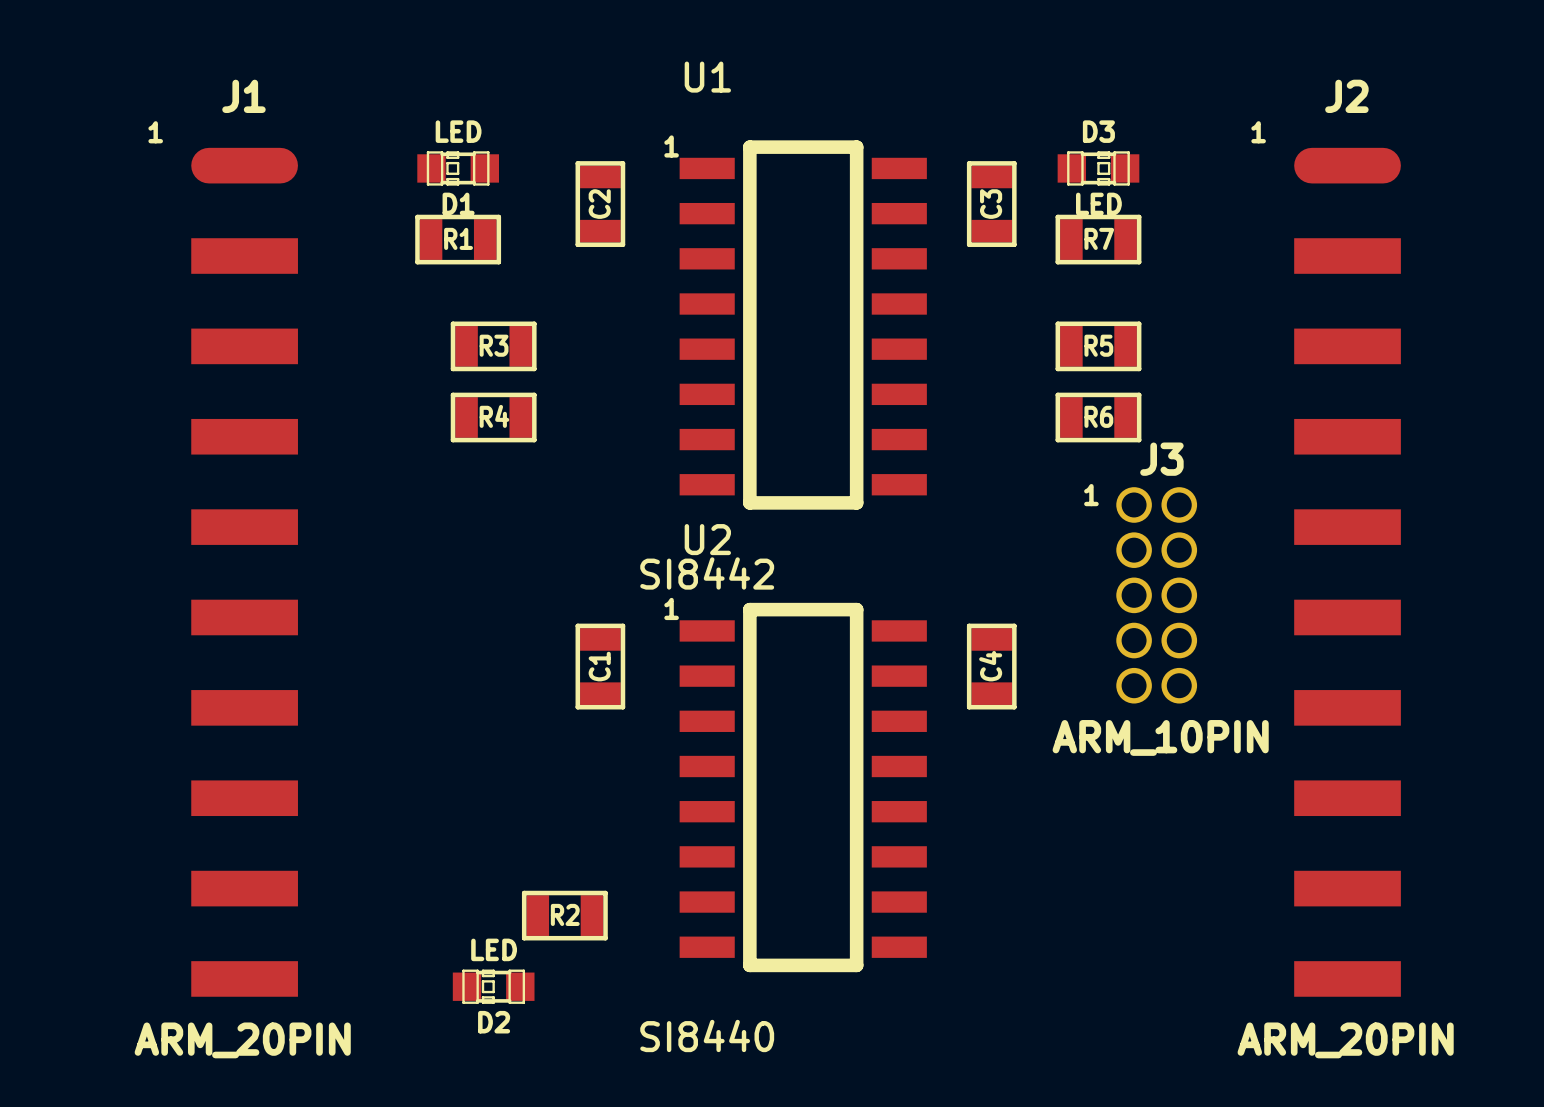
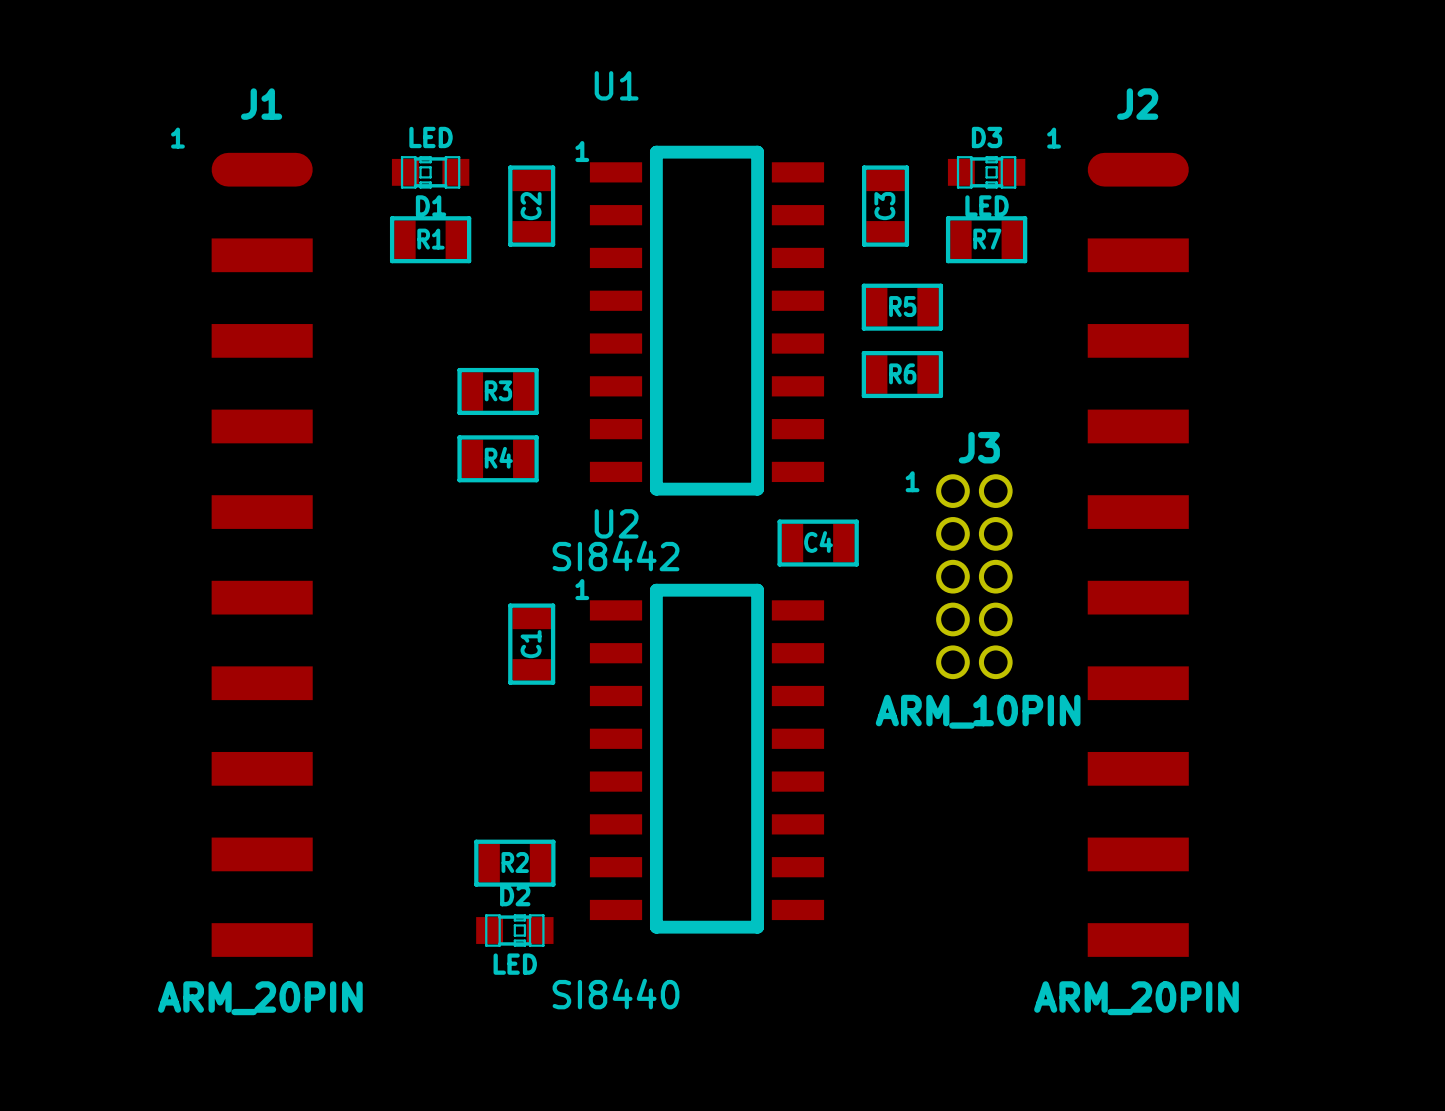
D1 position: (458, 168) -> (430, 172)
C2 position: (600, 204) -> (531, 206)
R1 position: (458, 239) -> (430, 239)
R3 position: (493, 346) -> (498, 391)
R5 position: (1098, 346) -> (902, 307)
R4 position: (493, 417) -> (498, 458)
R6 position: (1098, 417) -> (902, 374)
J1 position: (244, 572) -> (262, 554)
J2 position: (1347, 572) -> (1138, 554)
J3 position: (1156, 595) -> (974, 576)
C1 position: (600, 666) -> (531, 644)
C4 rotation: 0° (991, 666) -> 90° clockwise (818, 543)
C4 position: (991, 666) -> (818, 543)
R2 position: (564, 915) -> (514, 863)
D2 rotation: 0° (493, 986) -> 180° (514, 930)
D2 position: (493, 986) -> (514, 930)

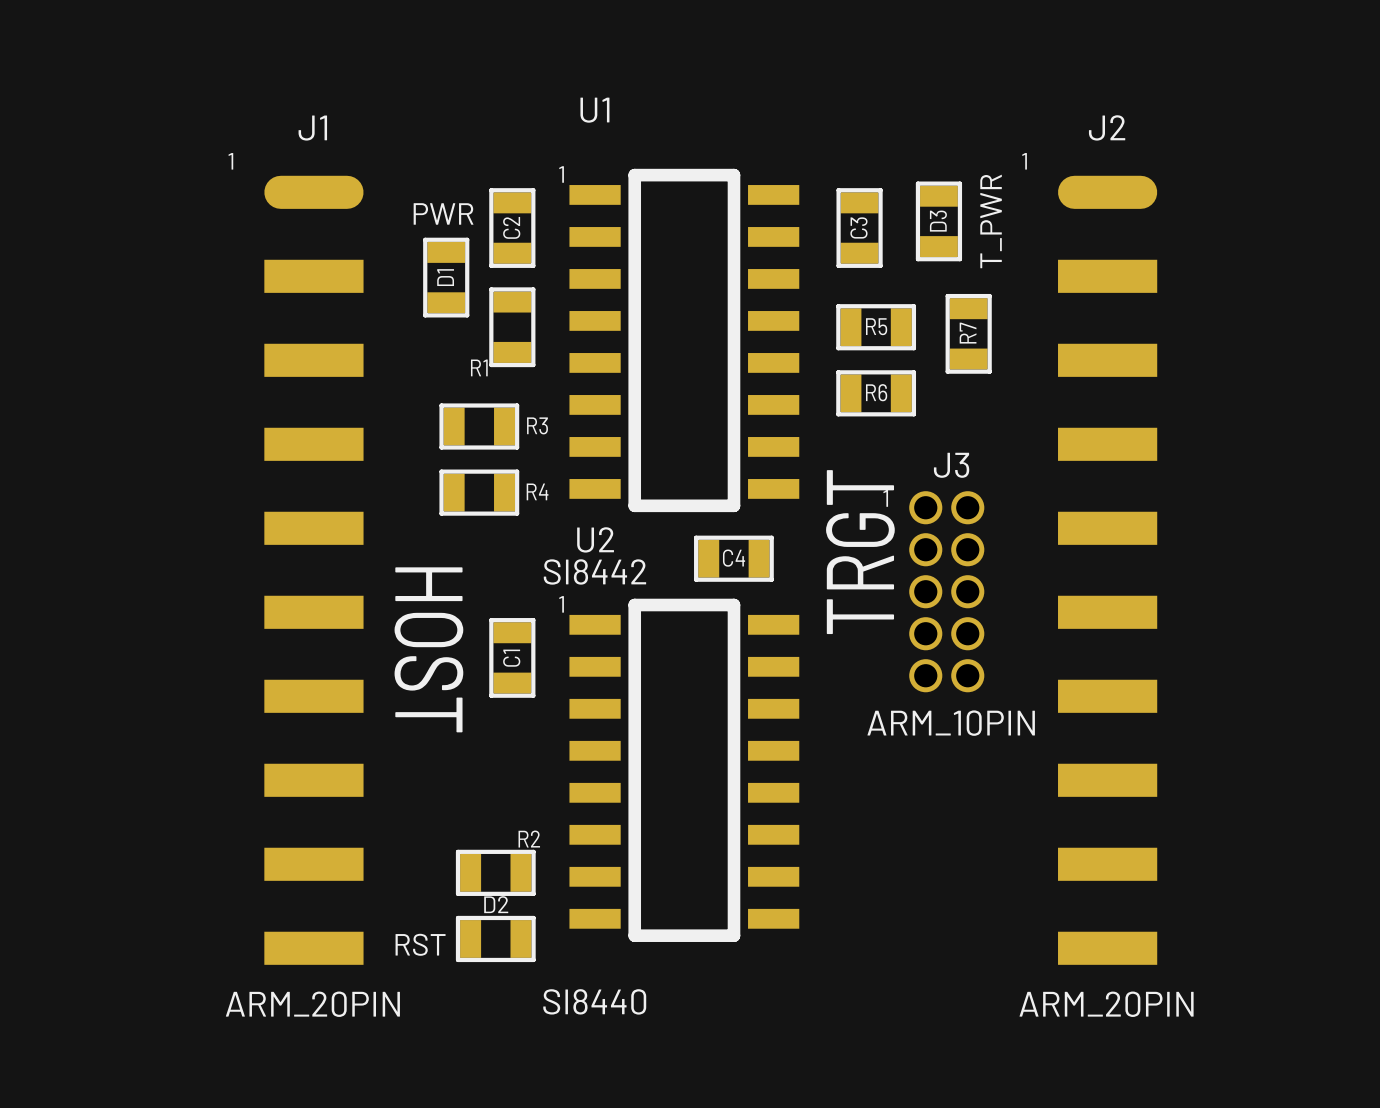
D1 value: LED (431, 137) -> none
D1 footprint: [391, 156, 470, 189] -> [423, 237, 470, 318]
D3 footprint: [947, 156, 1026, 189] -> [915, 181, 963, 262]
text: none -> PWR (443, 213)
text: none -> T_PWR (991, 221)
D3 value: LED (987, 205) -> none
R1 rotation: 0° (430, 239) -> 90° clockwise (512, 327)
R1 position: (430, 239) -> (512, 327)
R7 rotation: 0° (986, 239) -> 90° clockwise (968, 333)
R7 position: (986, 239) -> (968, 333)
R3 name position: R3 (498, 390) -> R3 (537, 425)
R3 position: (498, 391) -> (479, 426)
R4 name position: R4 (498, 457) -> R4 (537, 491)
R4 position: (498, 458) -> (479, 492)
text: none -> TRGT (860, 552)
C4 position: (818, 543) -> (733, 558)
J1 position: (262, 554) -> (313, 570)
text: none -> HOST (428, 649)
R2 name position: R2 (515, 862) -> R2 (529, 839)
D2 footprint: [476, 914, 554, 947] -> [455, 915, 536, 963]
text: none -> RST (420, 944)
D2 value: LED (515, 964) -> none

